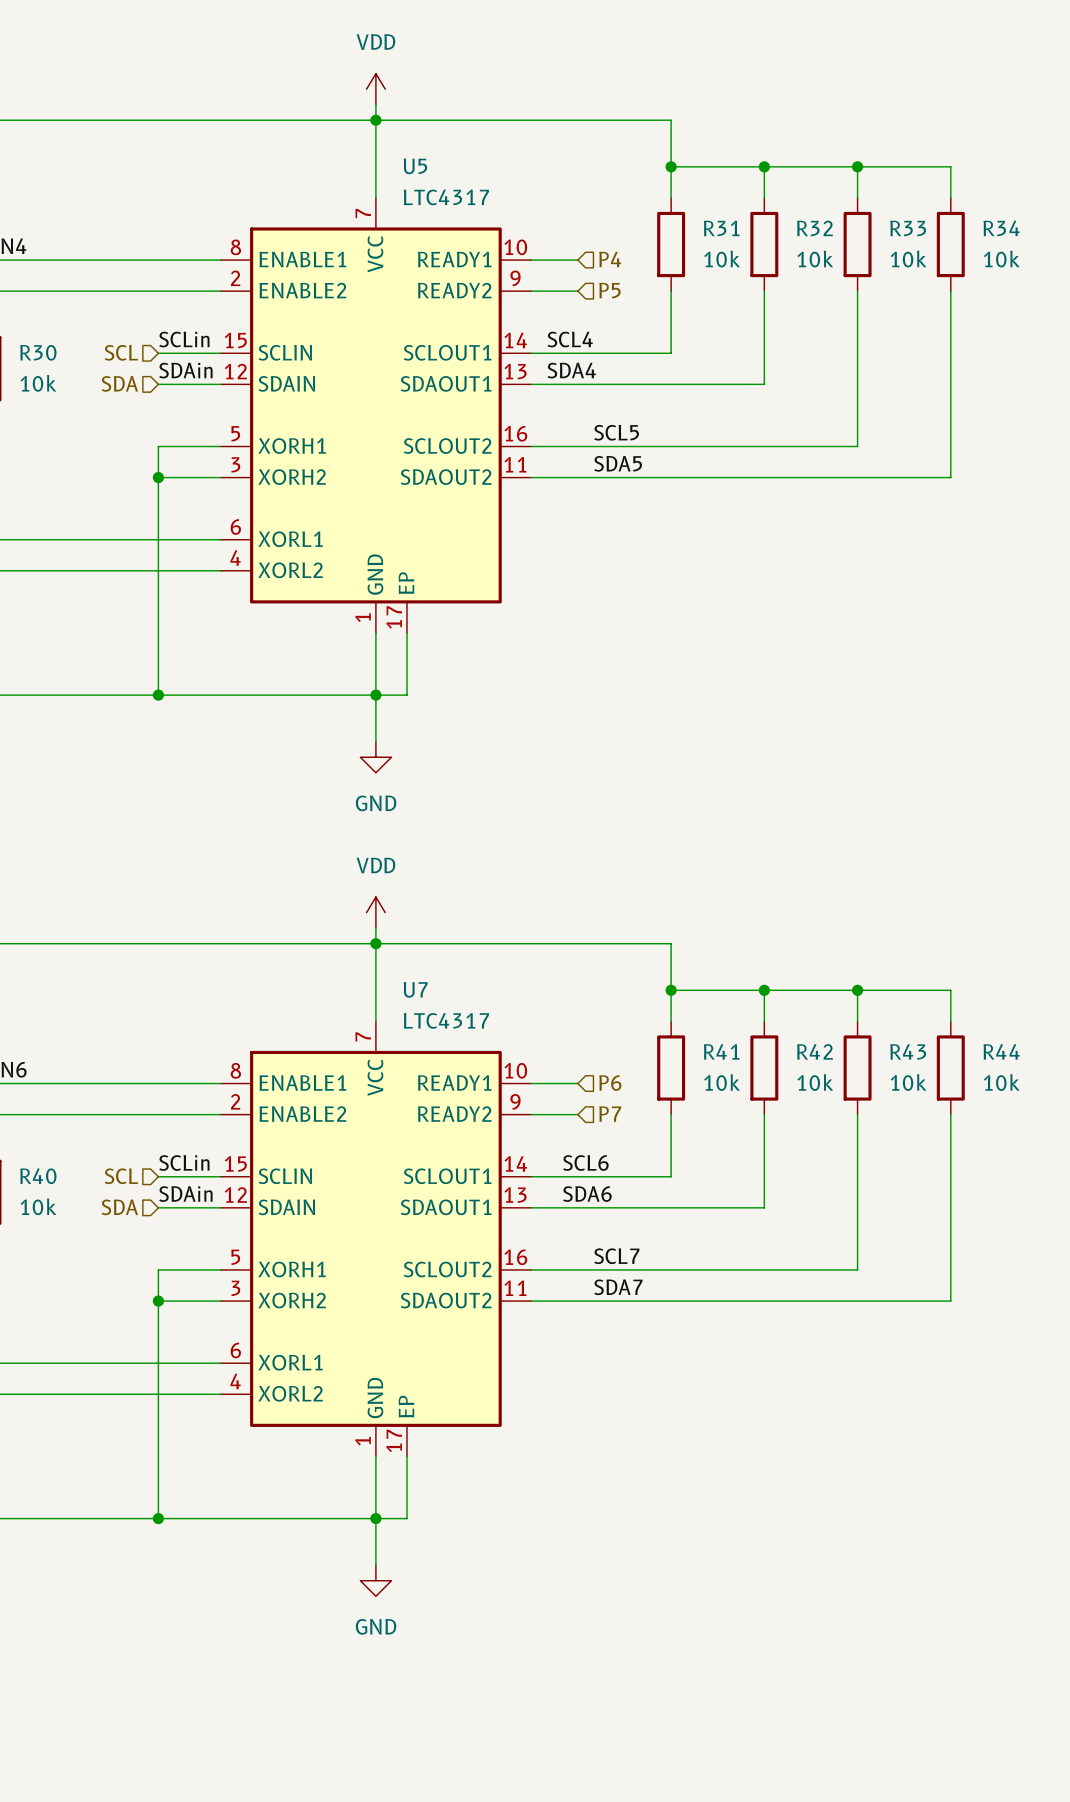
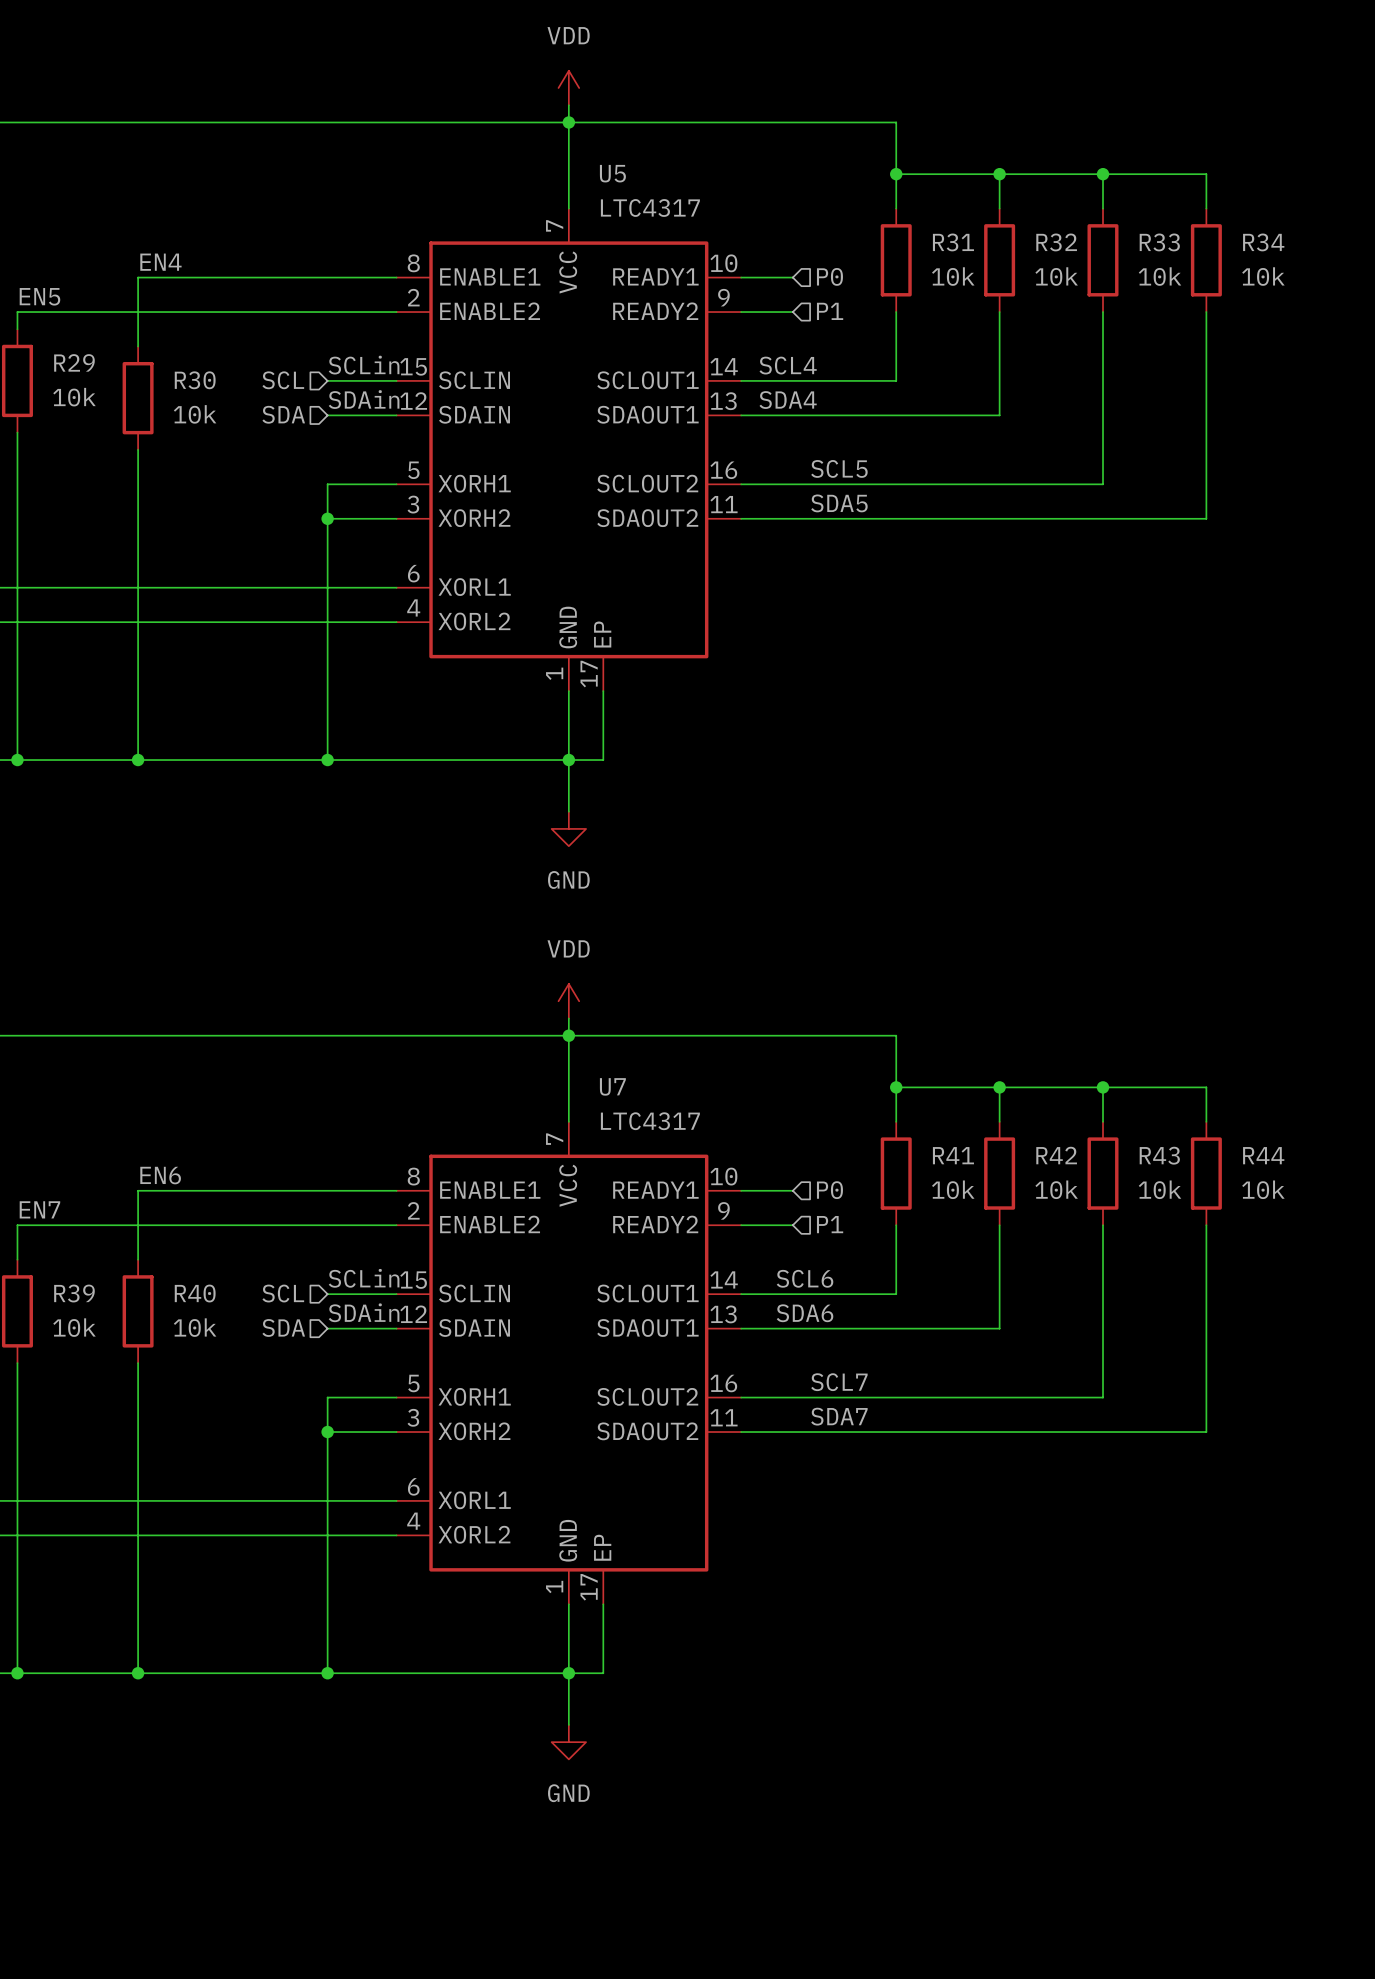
hierarchical label: P4 (610, 259) -> P0 (829, 276)
hierarchical label: P5 (609, 290) -> P1 (830, 311)
hierarchical label: P6 (610, 1083) -> P0 (829, 1190)
hierarchical label: P7 (610, 1114) -> P1 (830, 1224)

